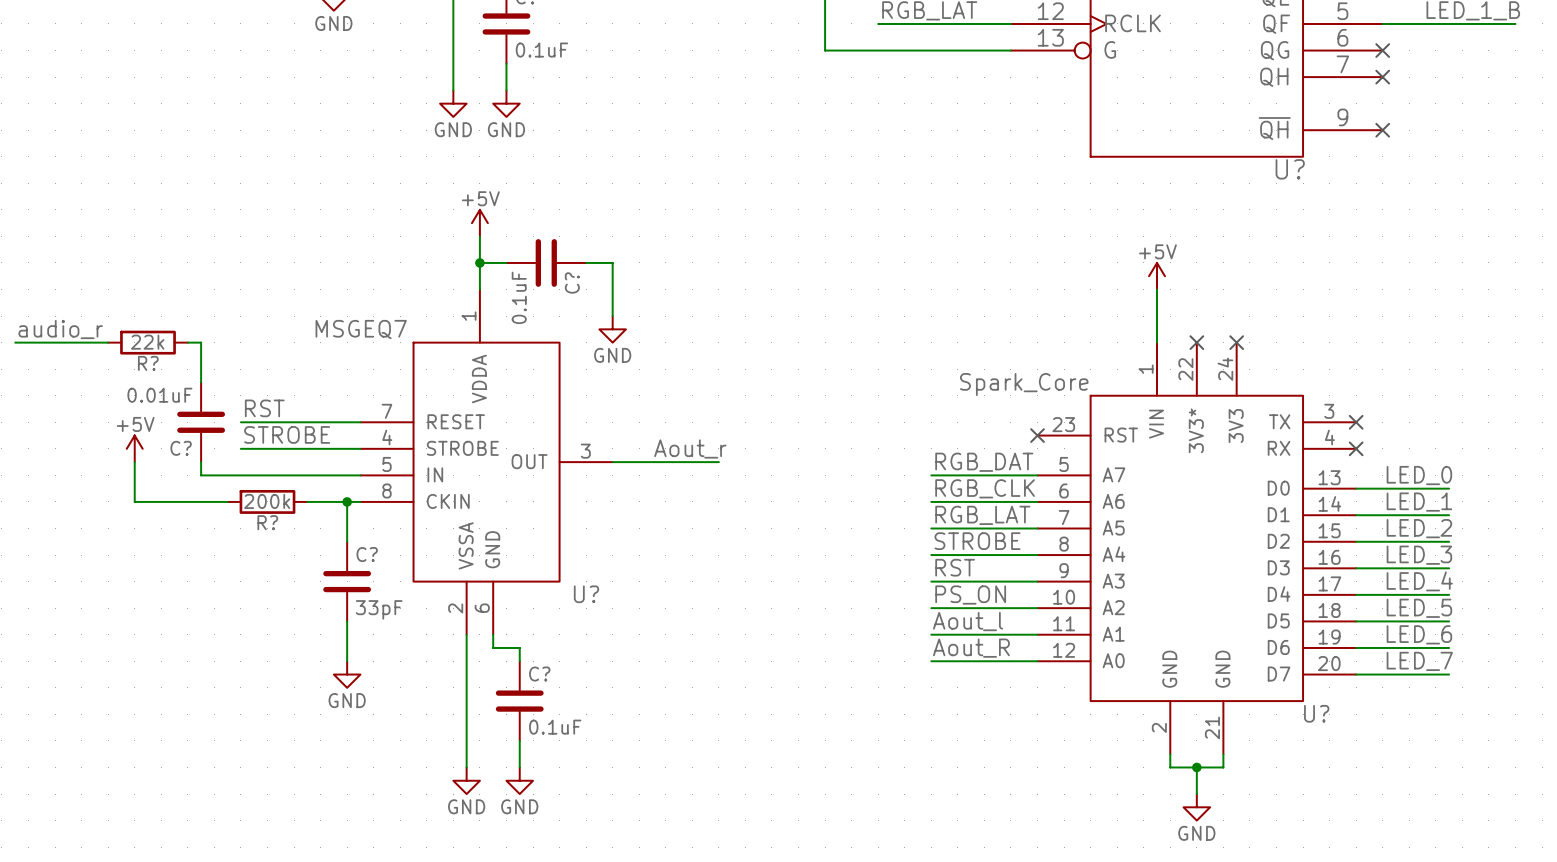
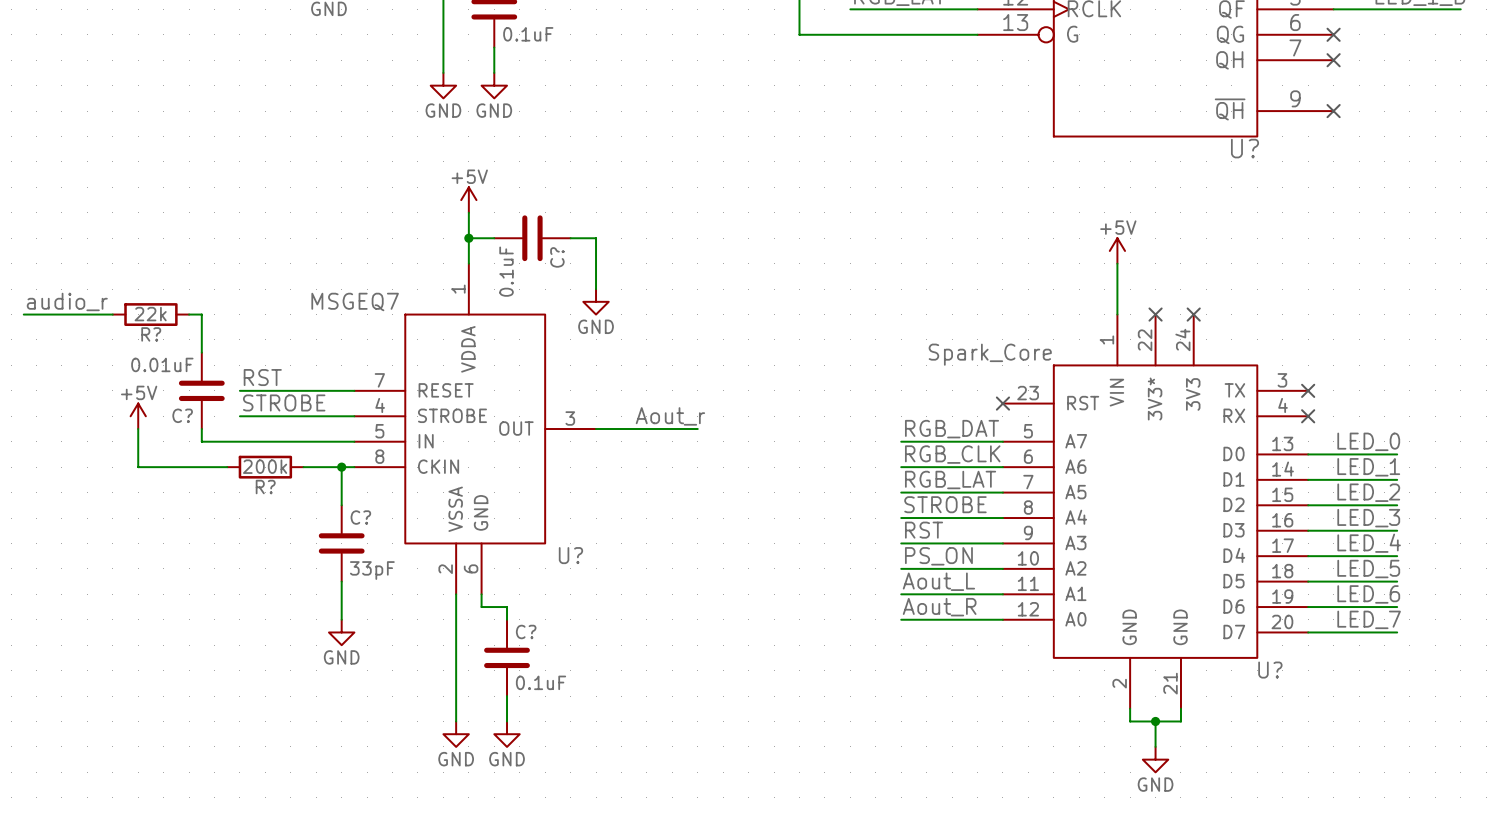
label: Aout_l (968, 621) -> Aout_L (938, 581)

